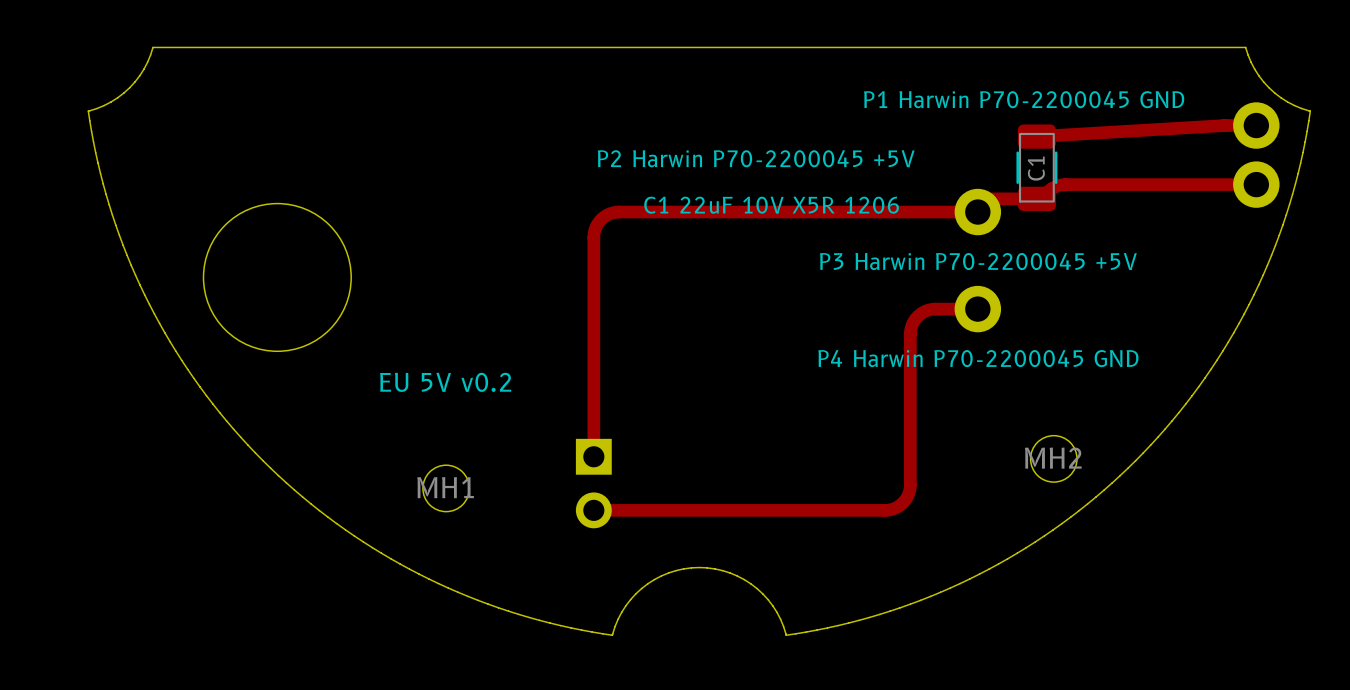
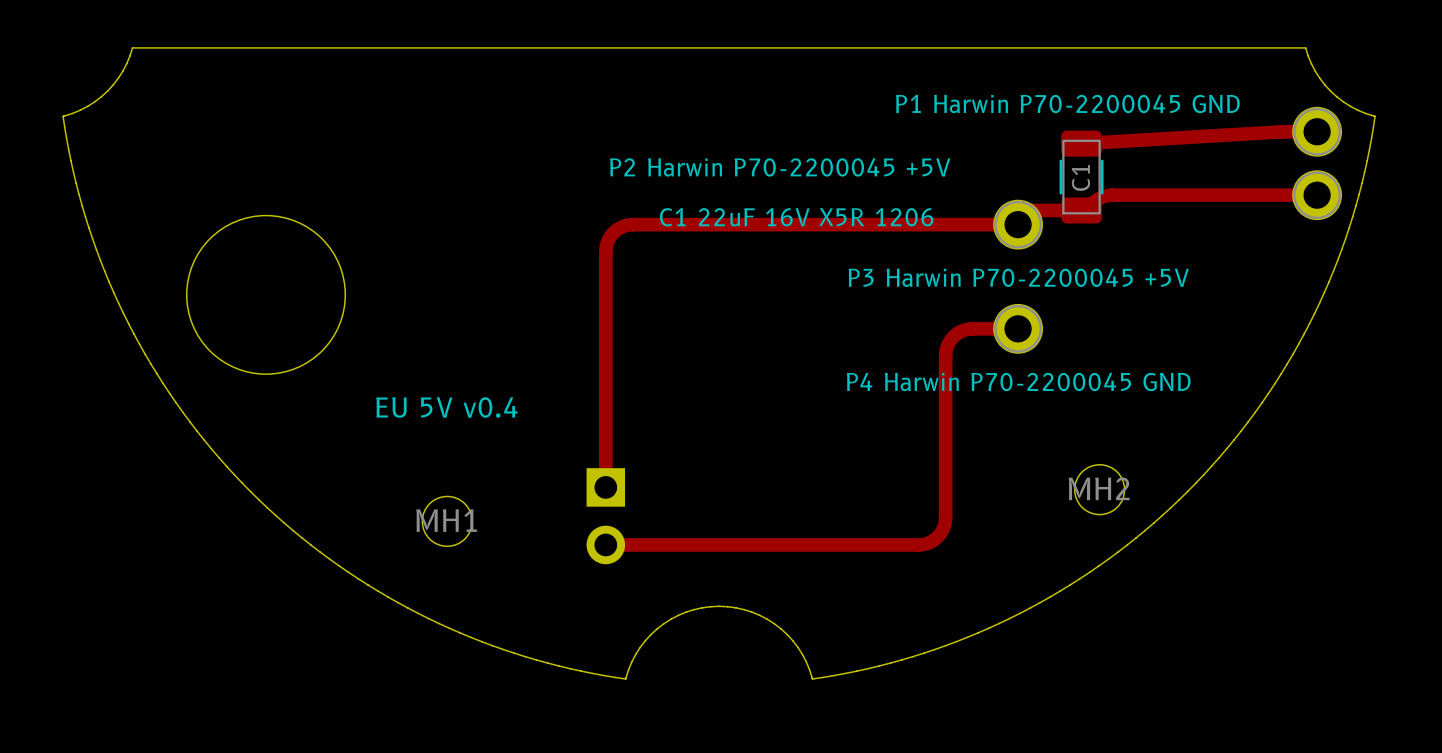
part footprint: [1233, 102, 1280, 149] -> [1292, 106, 1343, 157]
part footprint: [1233, 161, 1280, 208] -> [1292, 170, 1343, 221]
part footprint: [954, 188, 1002, 236] -> [993, 199, 1044, 250]
text: C1 22uF 10V X5R 1206 (771, 205) -> C1 22uF 16V X5R 1206 (796, 217)
part footprint: [954, 285, 1002, 333] -> [993, 303, 1044, 354]
text: EU 5V v0.2 (445, 382) -> EU 5V v0.4 (446, 407)

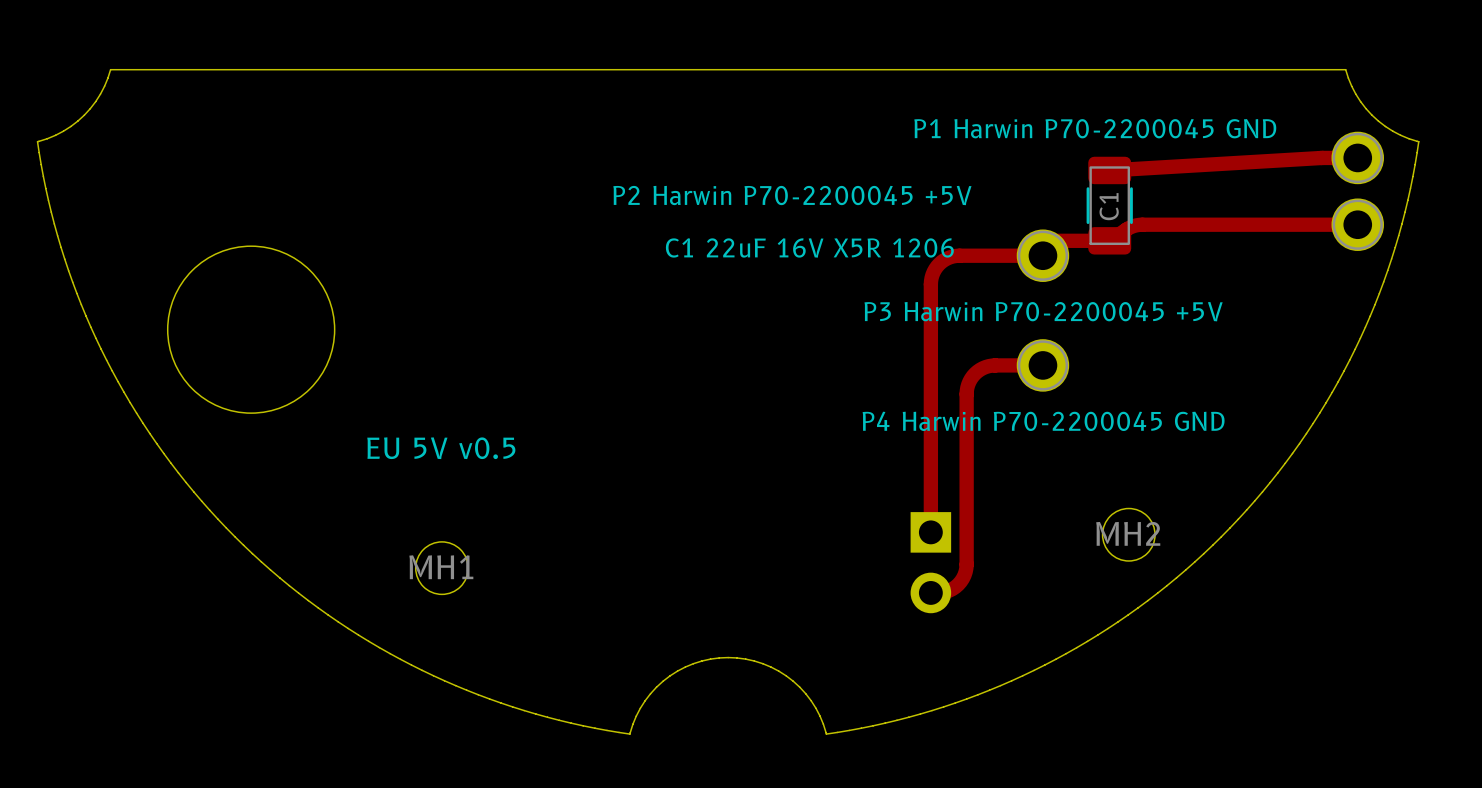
track: (938, 224) (632, 224) (624, 226) (616, 230) (608, 240) (605, 251) (605, 487) -> (959, 255) (950, 257) (941, 261) (933, 271) (931, 281) (930, 532)
text: EU 5V v0.4 (446, 407) -> EU 5V v0.5 (441, 448)
part position: (605, 516) -> (930, 562)
track: (605, 544) (911, 544) -> none

